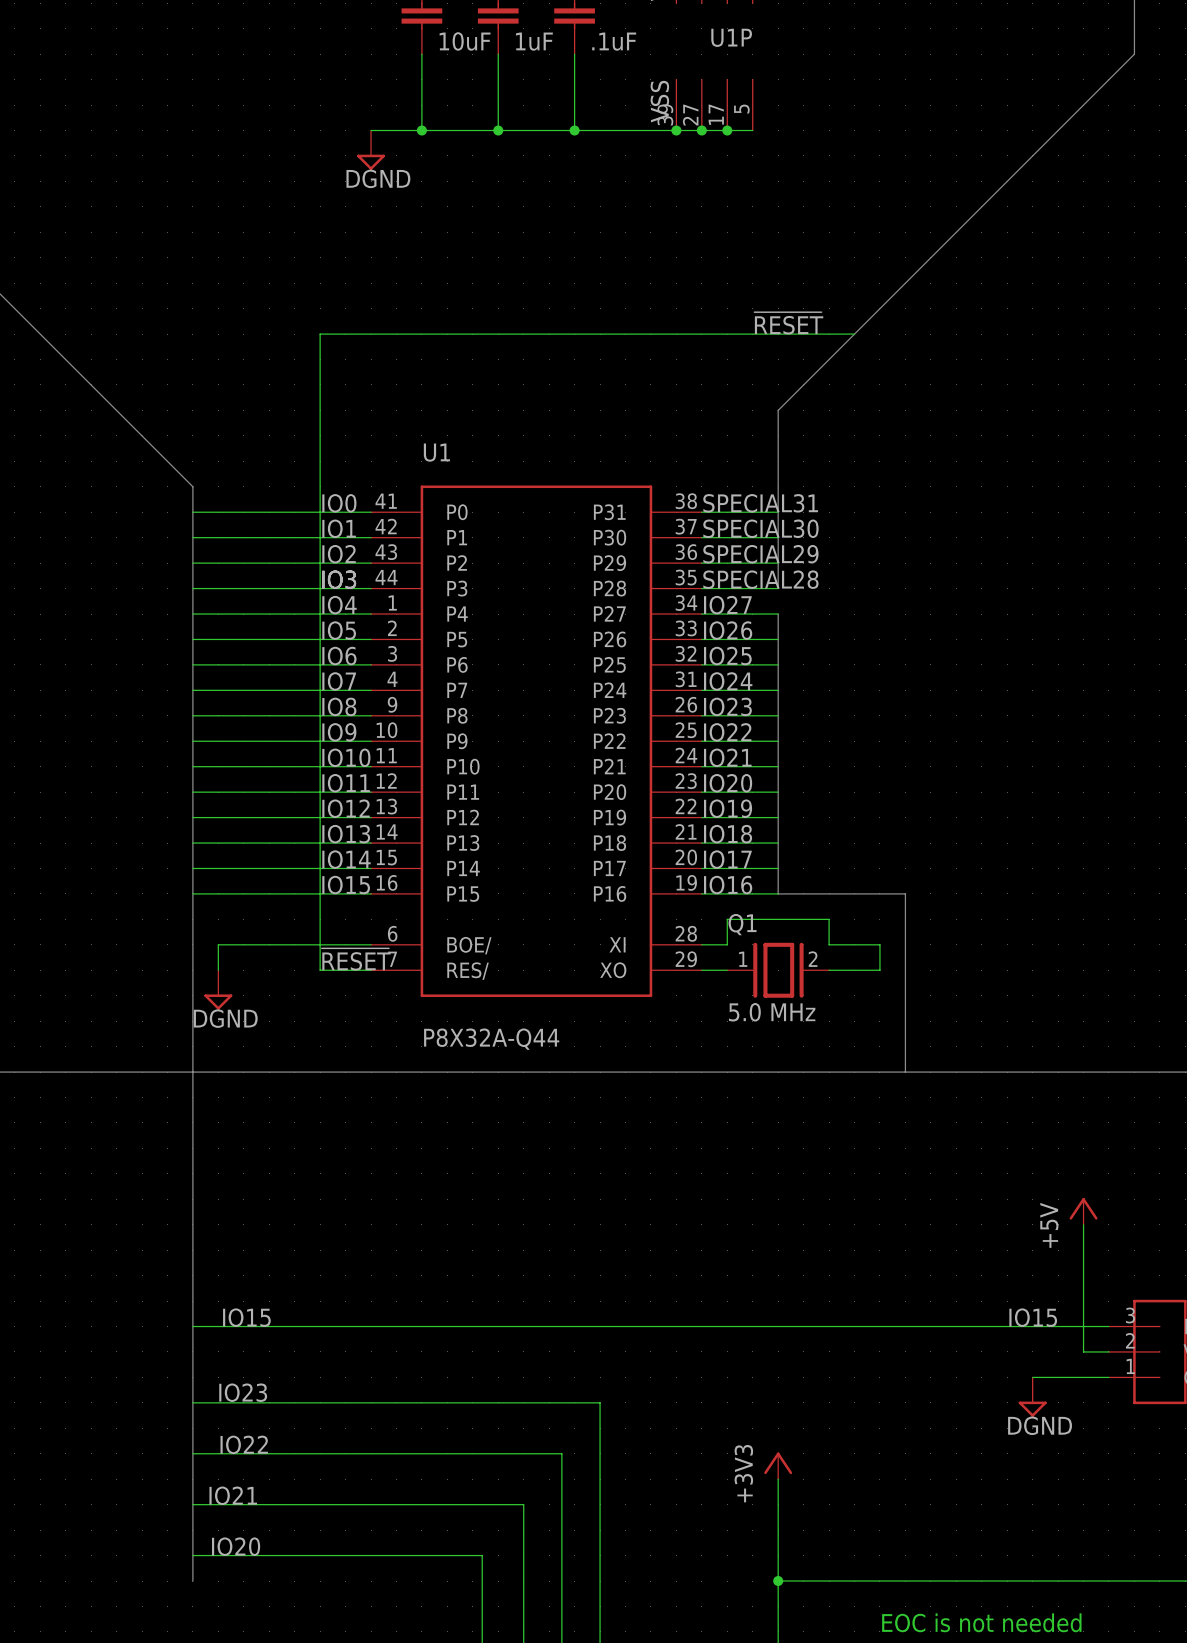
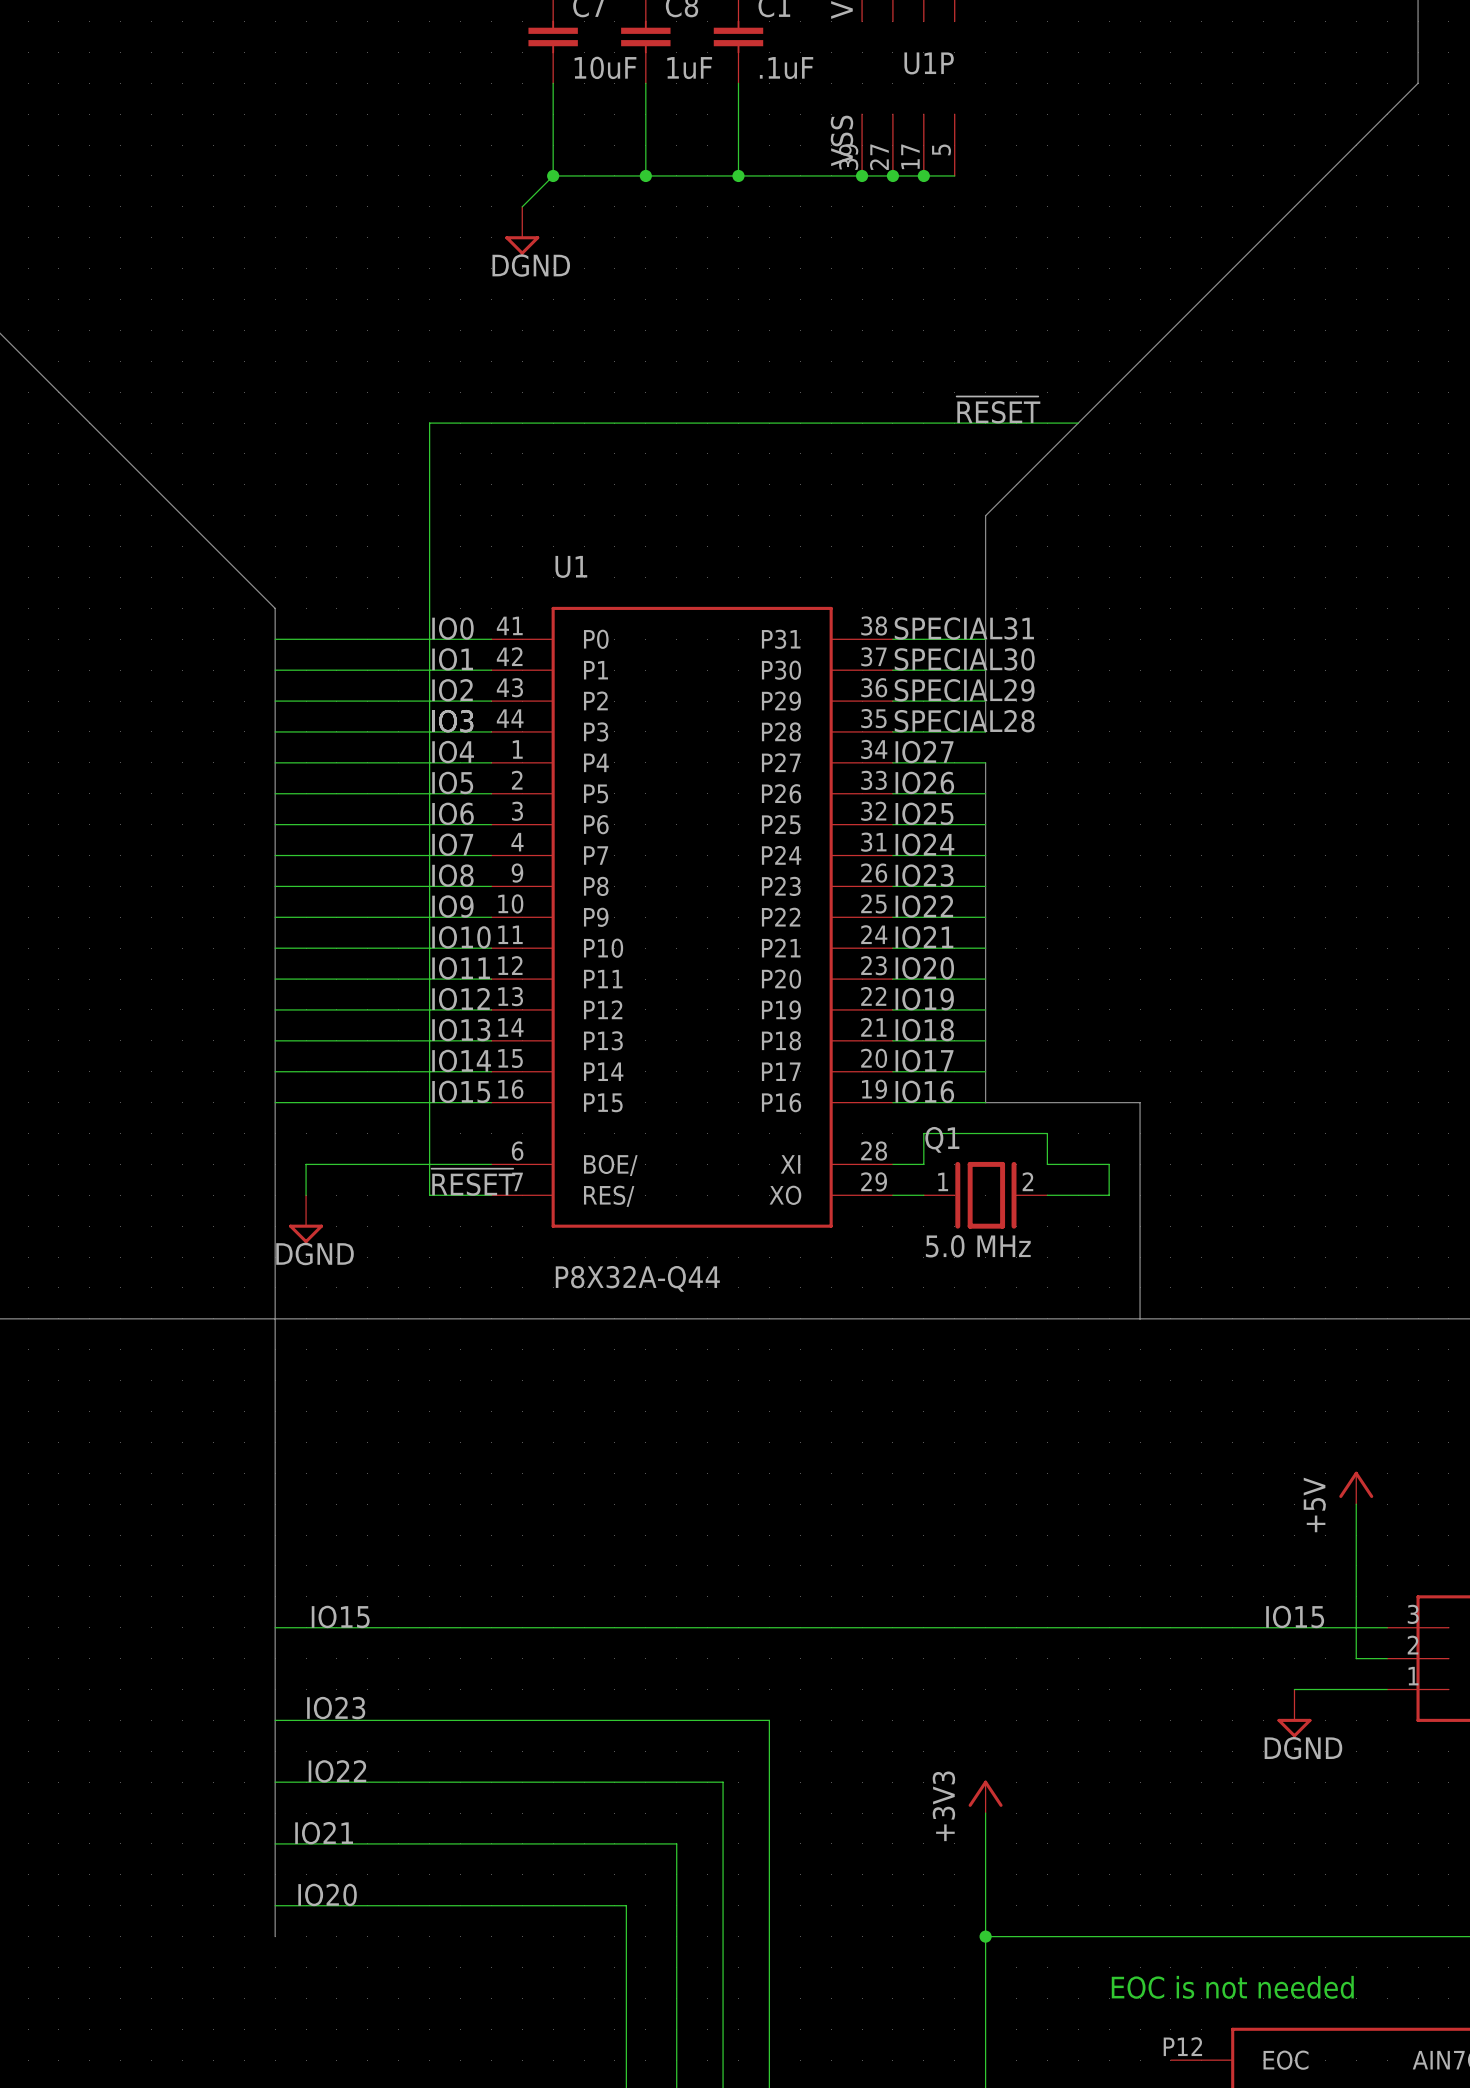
wire: (371, 130) (421, 130) -> (522, 206) (553, 175)
power symbol position: DGND (371, 150) -> DGND (522, 230)

